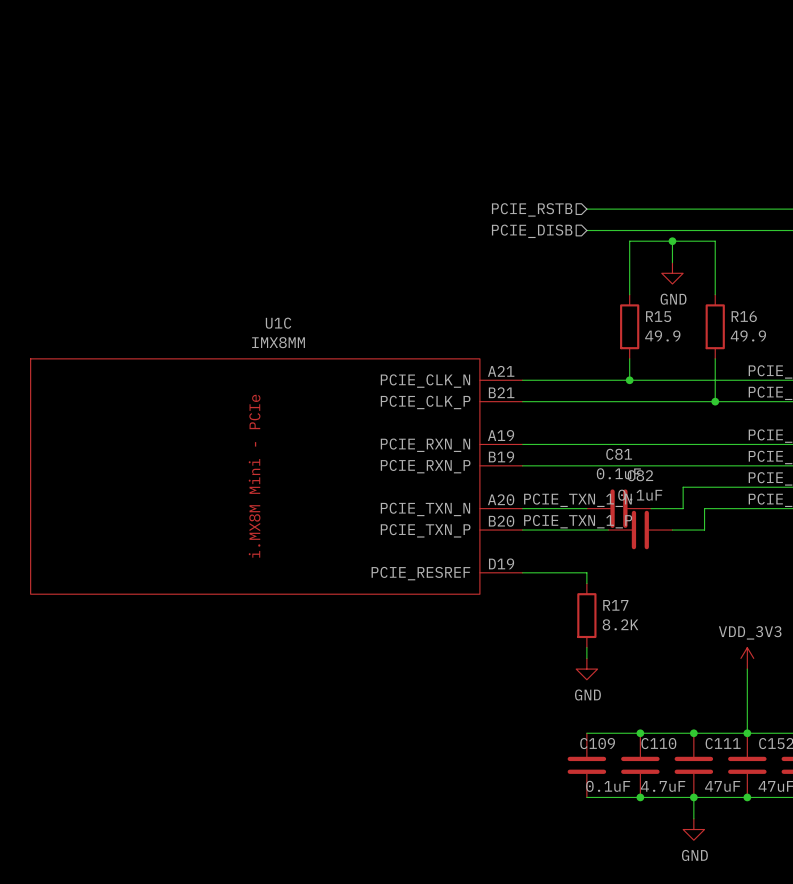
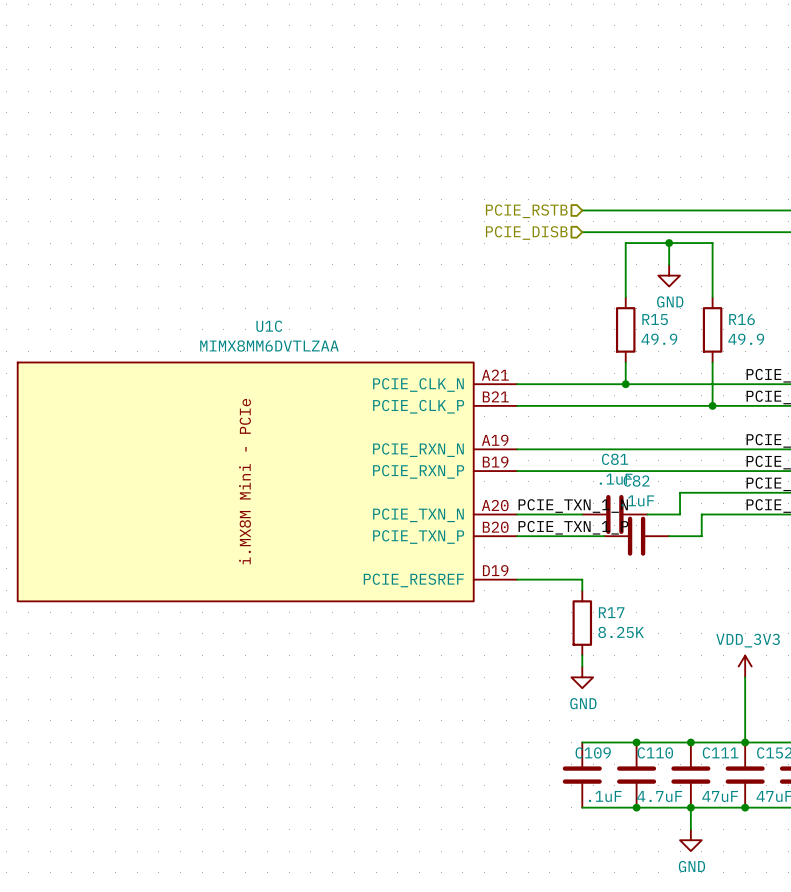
U1C value: IMX8MM (278, 342) -> MIMX8MM6DVTLZAA (269, 346)
C81 value: 0.1uF (618, 473) -> .1uF (616, 479)
C82 value: 0.1uF (640, 495) -> .1uF (637, 500)
R17 value: 8.2K (620, 624) -> 8.25K (621, 632)
C109 value: 0.1uF (608, 786) -> .1uF (605, 796)

